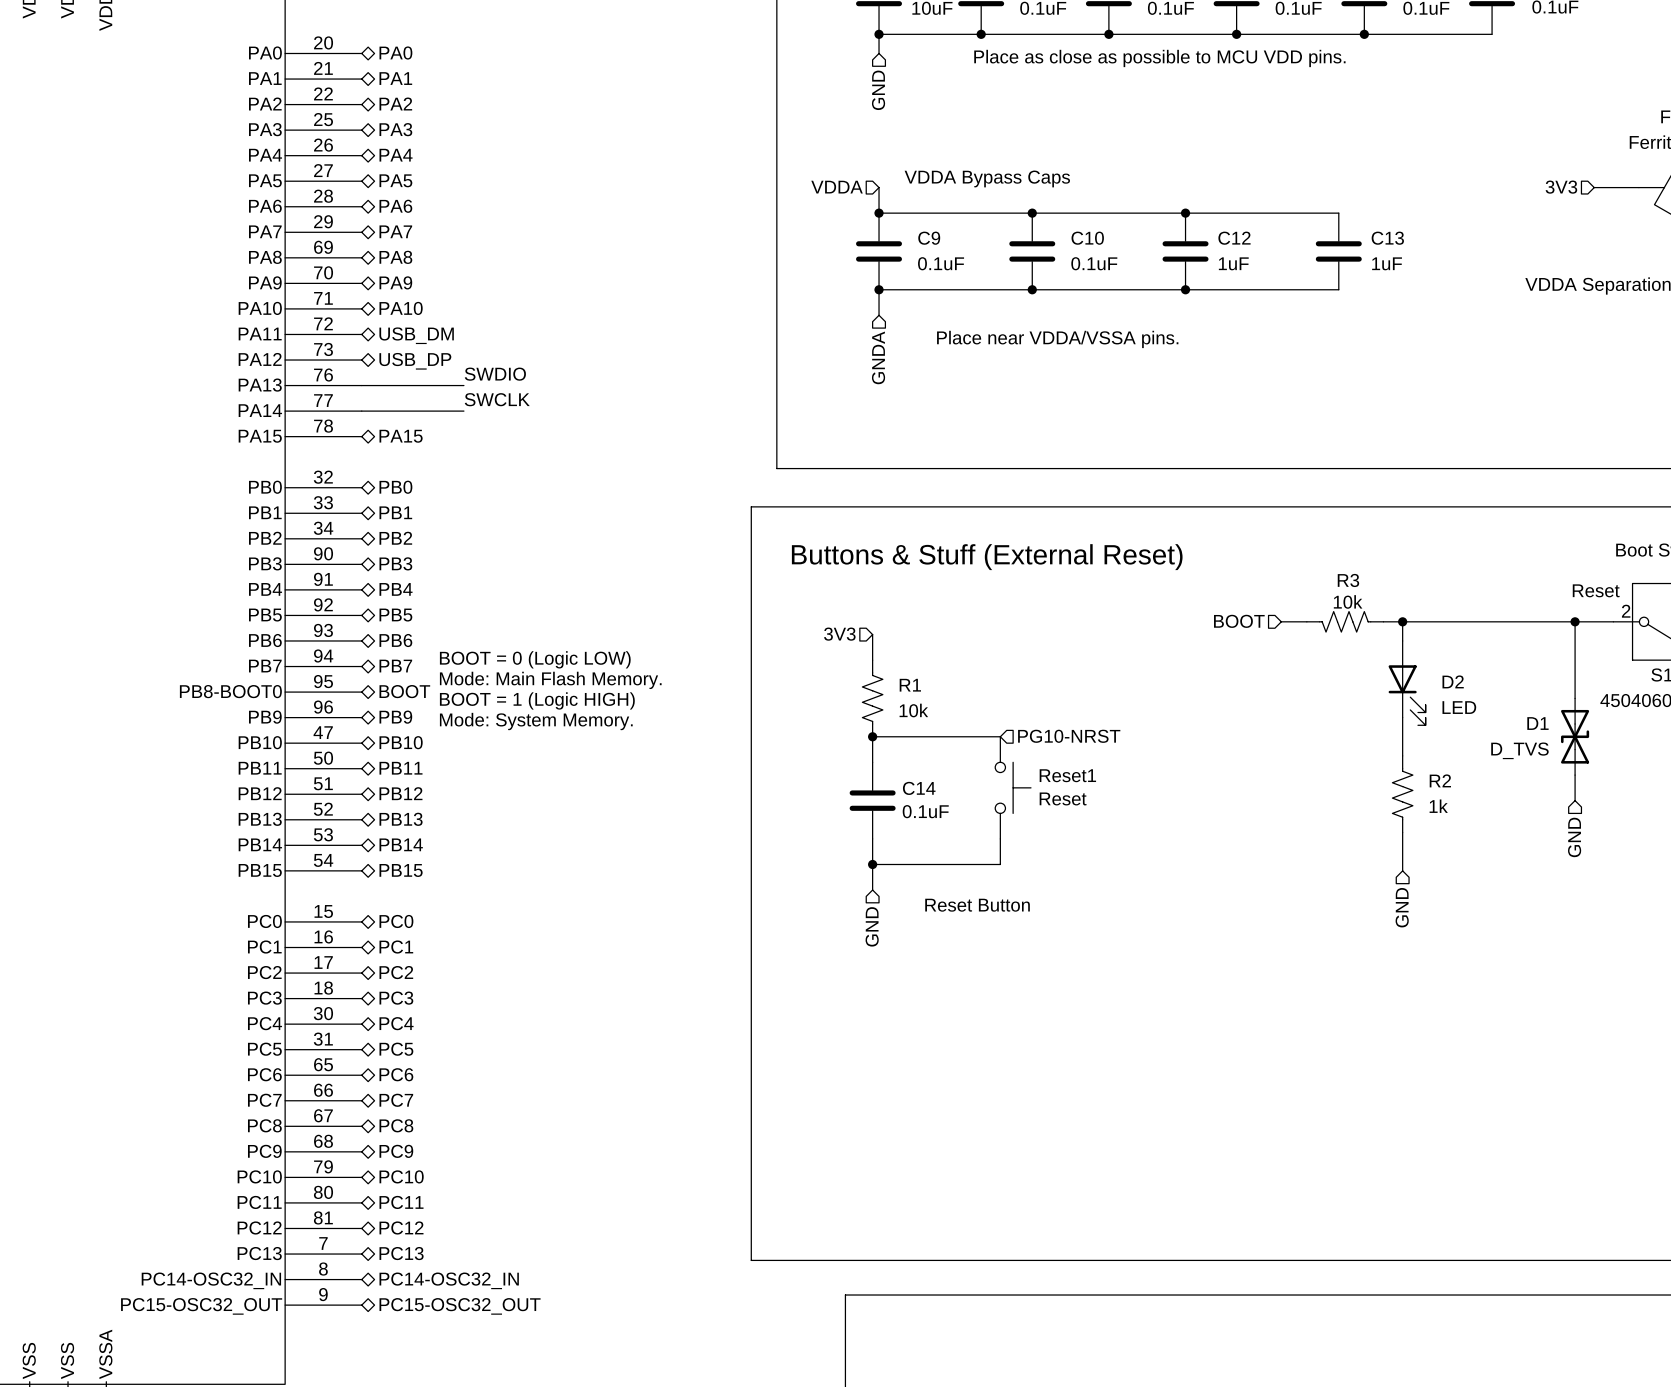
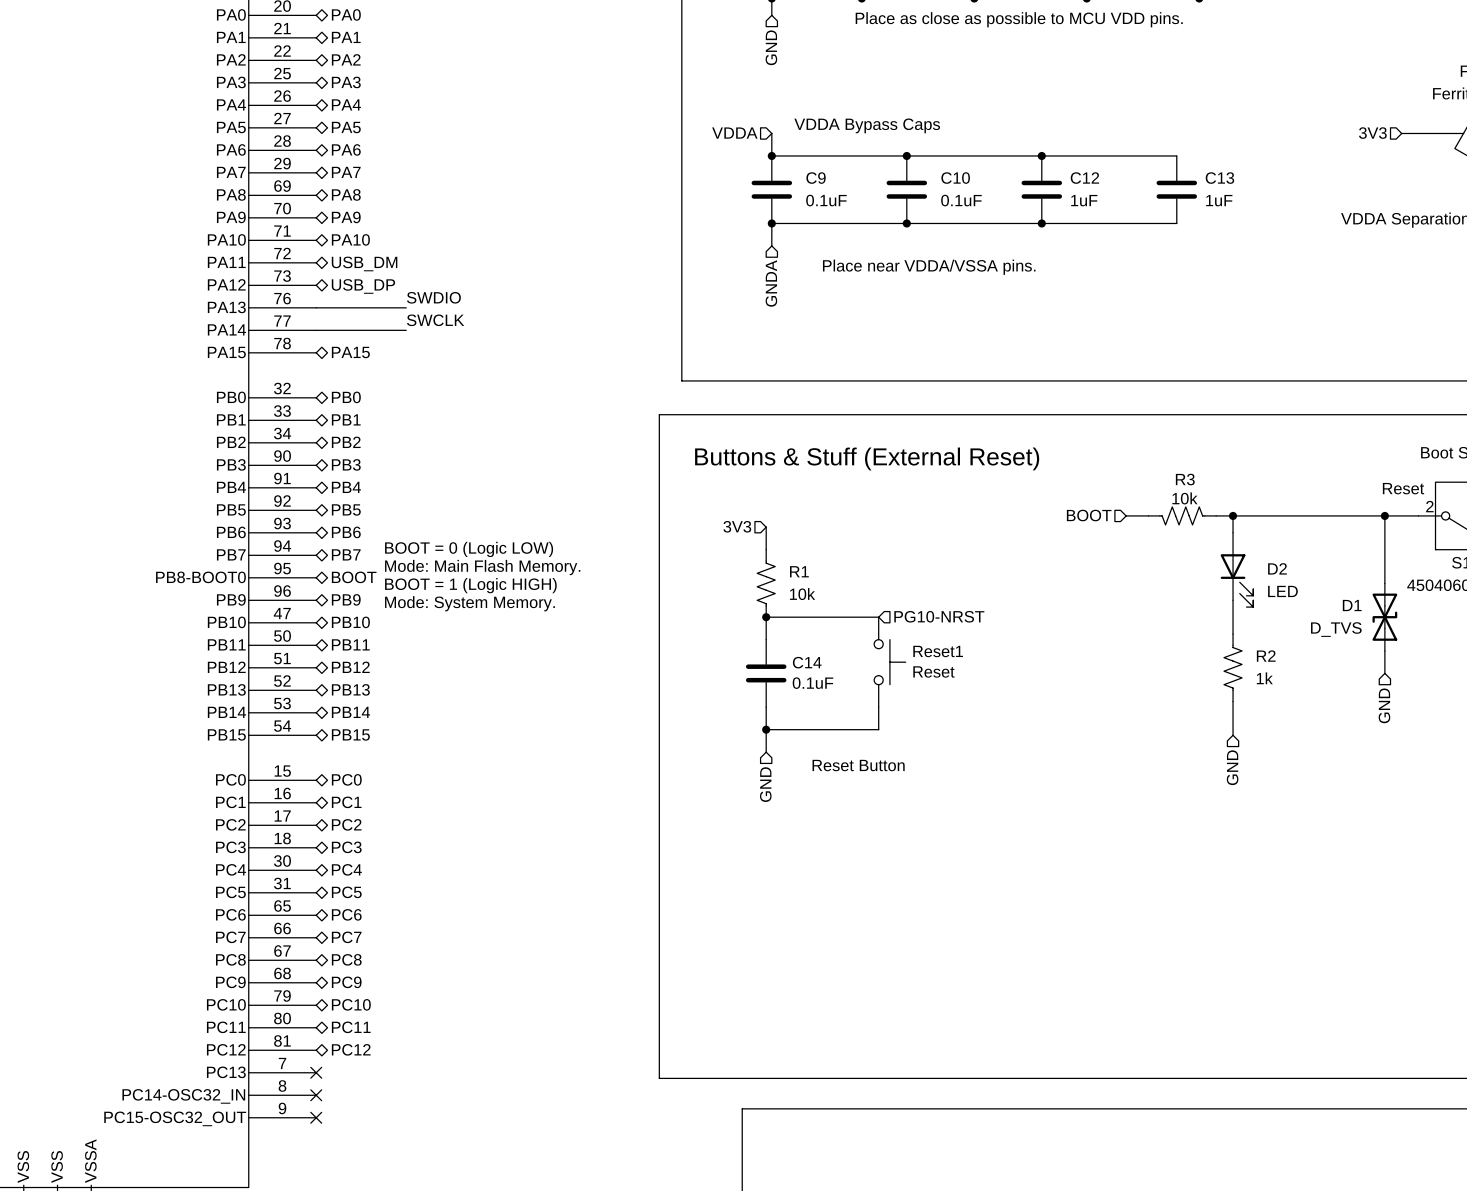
hierarchical label: PC13 (401, 1253) -> none
no-connect mark: none -> (316, 1072)
no-connect mark: none -> (316, 1095)
hierarchical label: PC14-OSC32_IN (449, 1280) -> none
no-connect mark: none -> (316, 1117)
hierarchical label: PC15-OSC32_OUT (460, 1306) -> none

